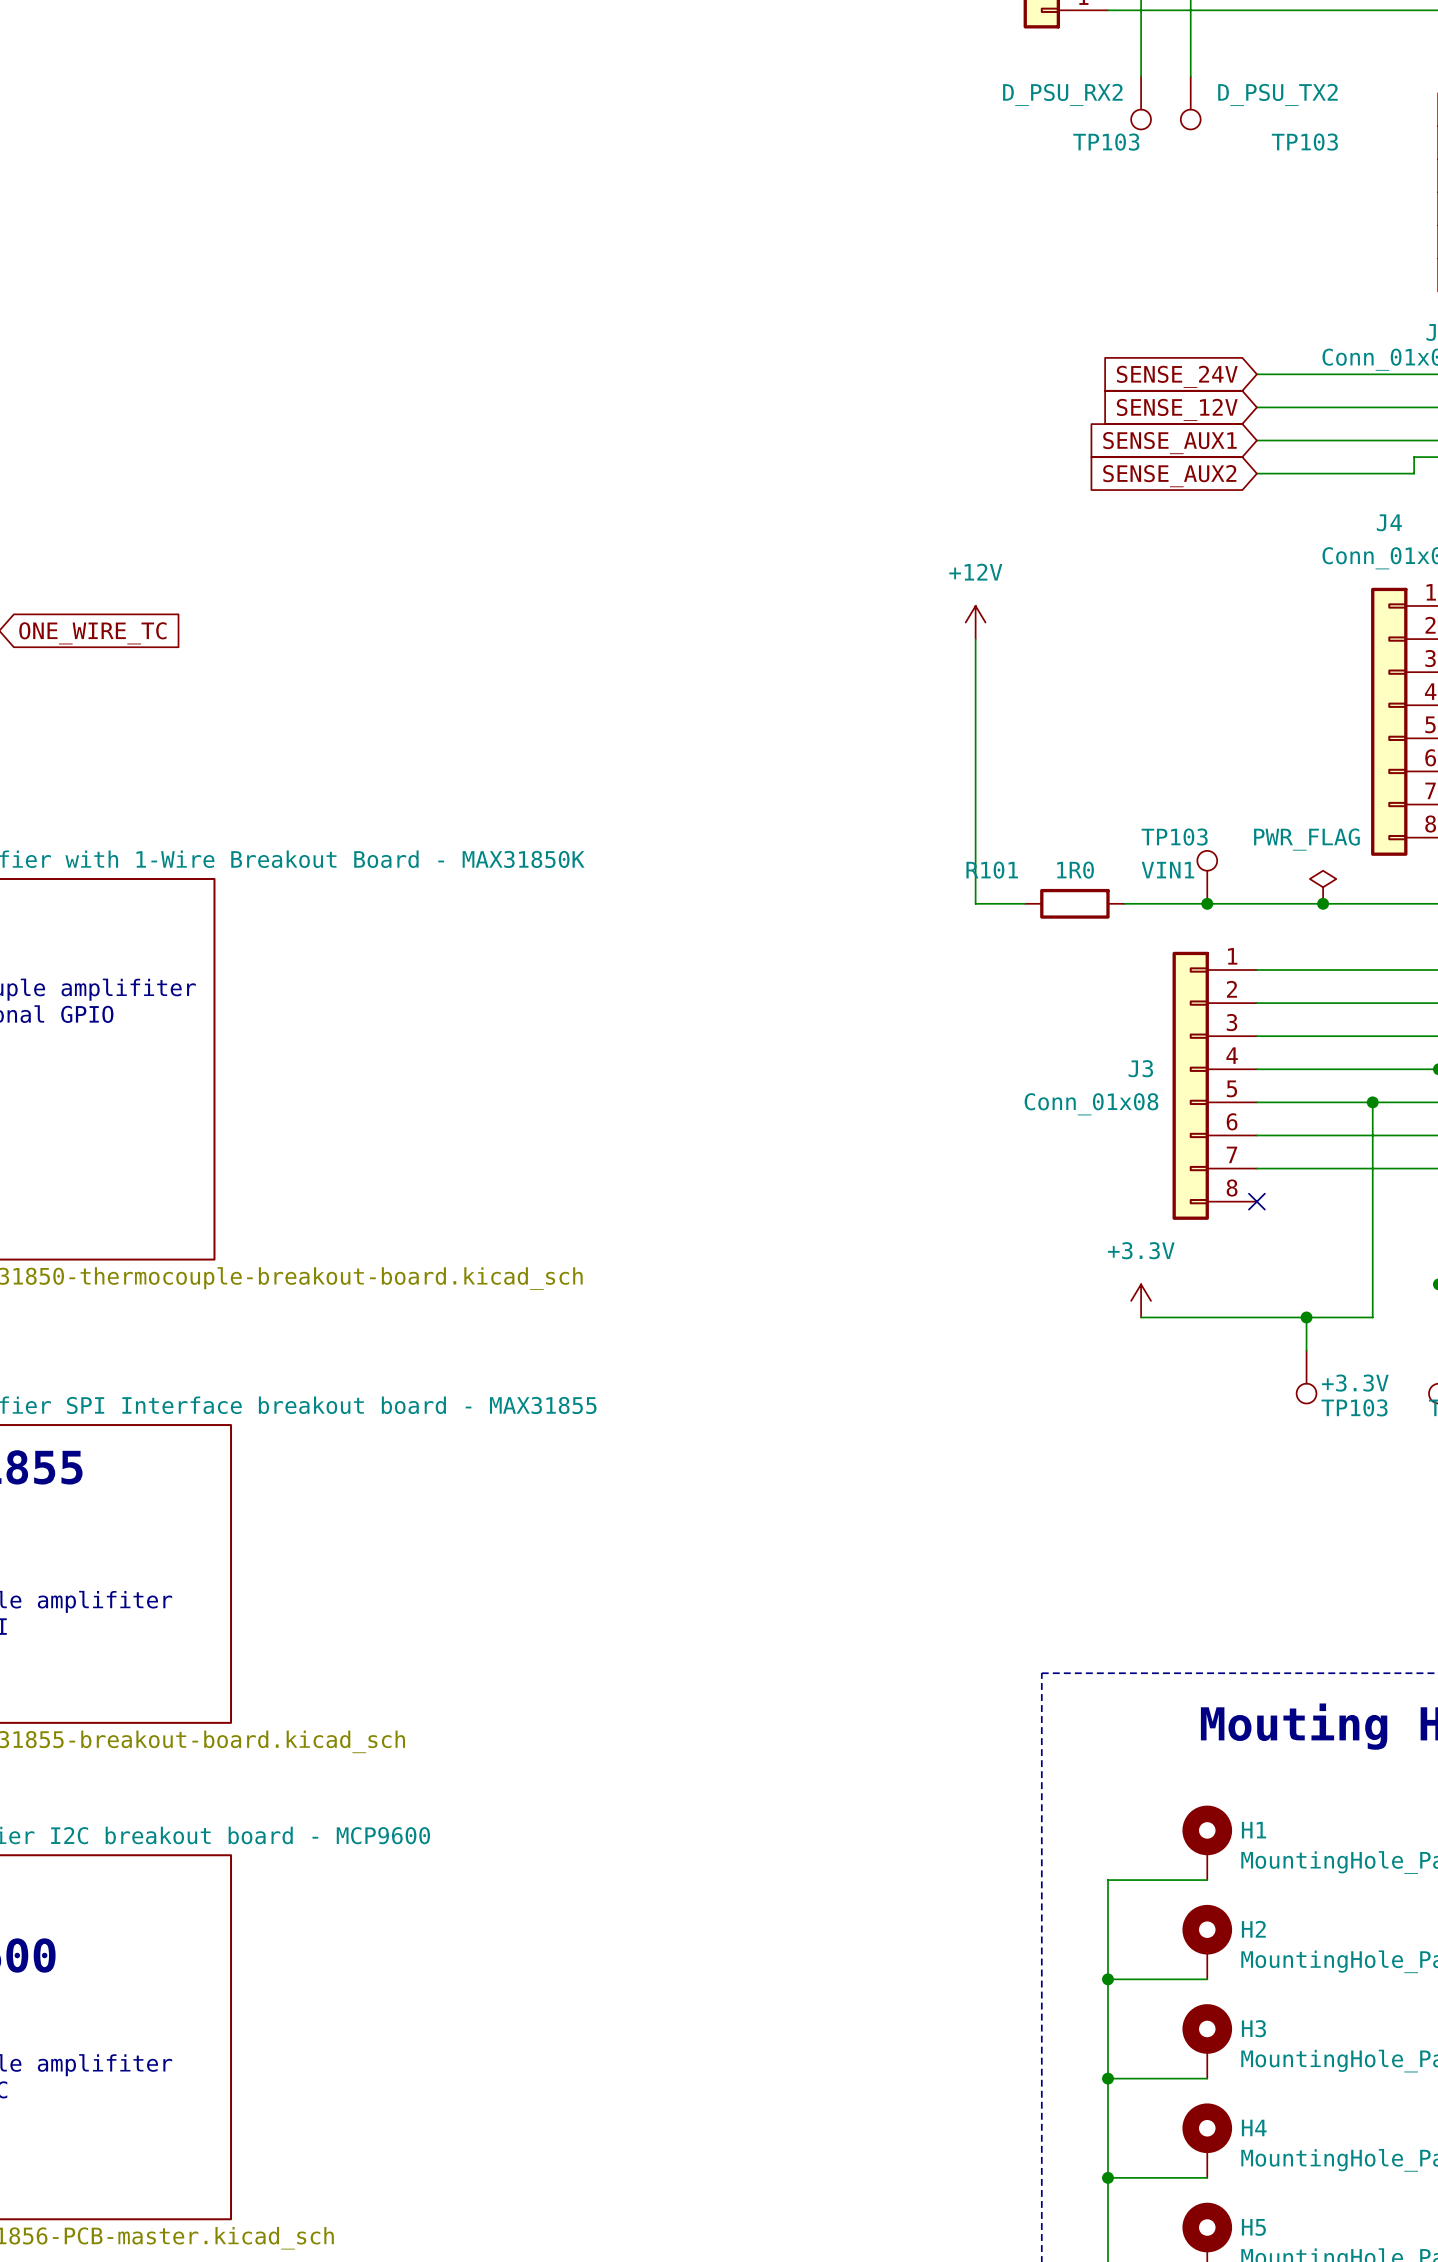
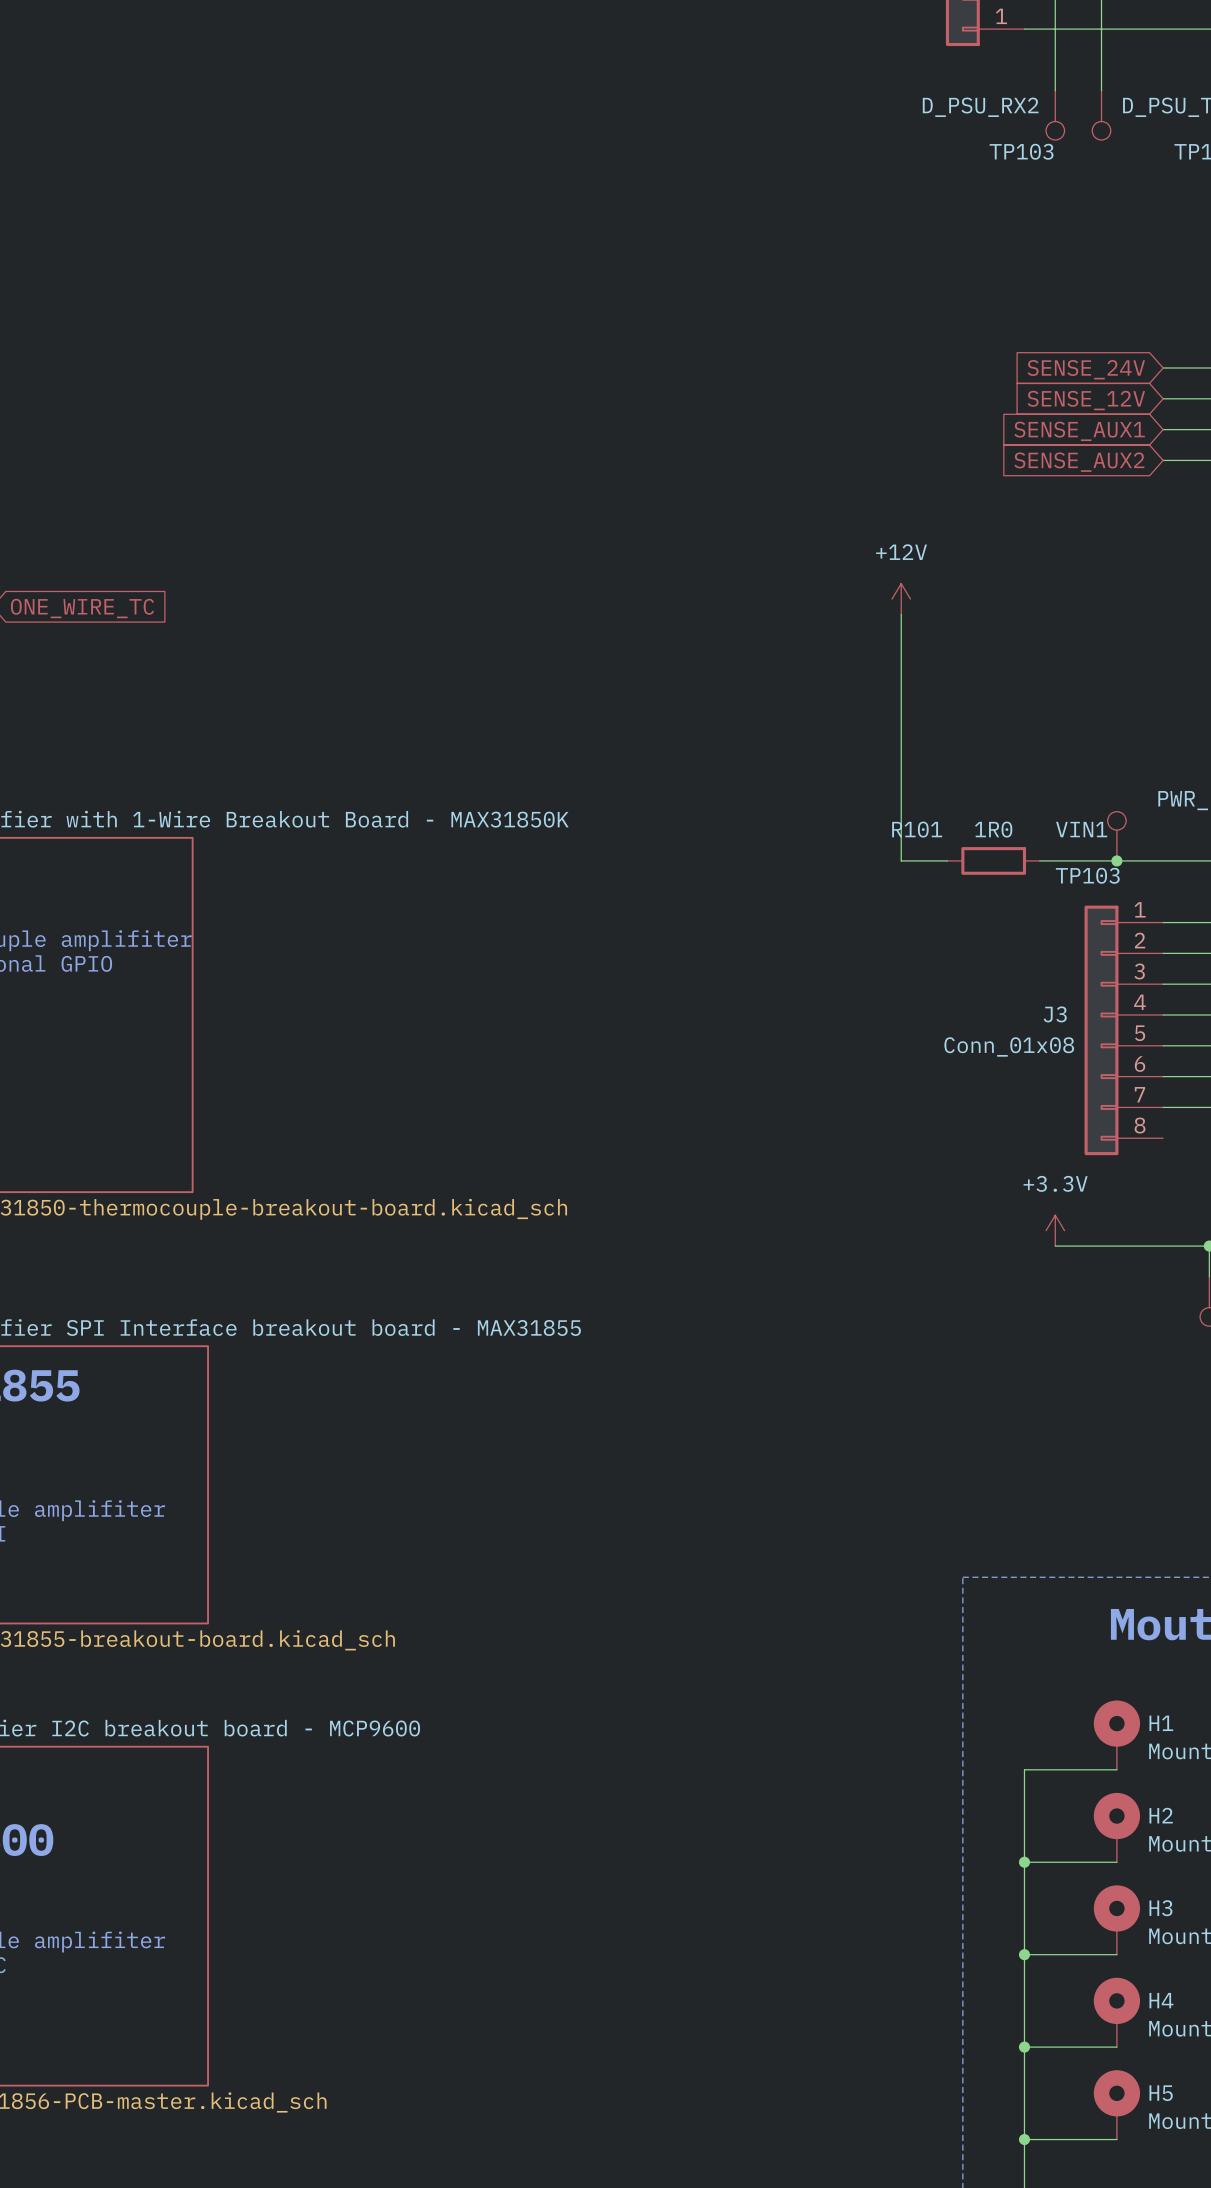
TP103 name position: TP103 (1174, 837) -> TP103 (1087, 875)
no-connect mark: (1256, 1201) -> none

